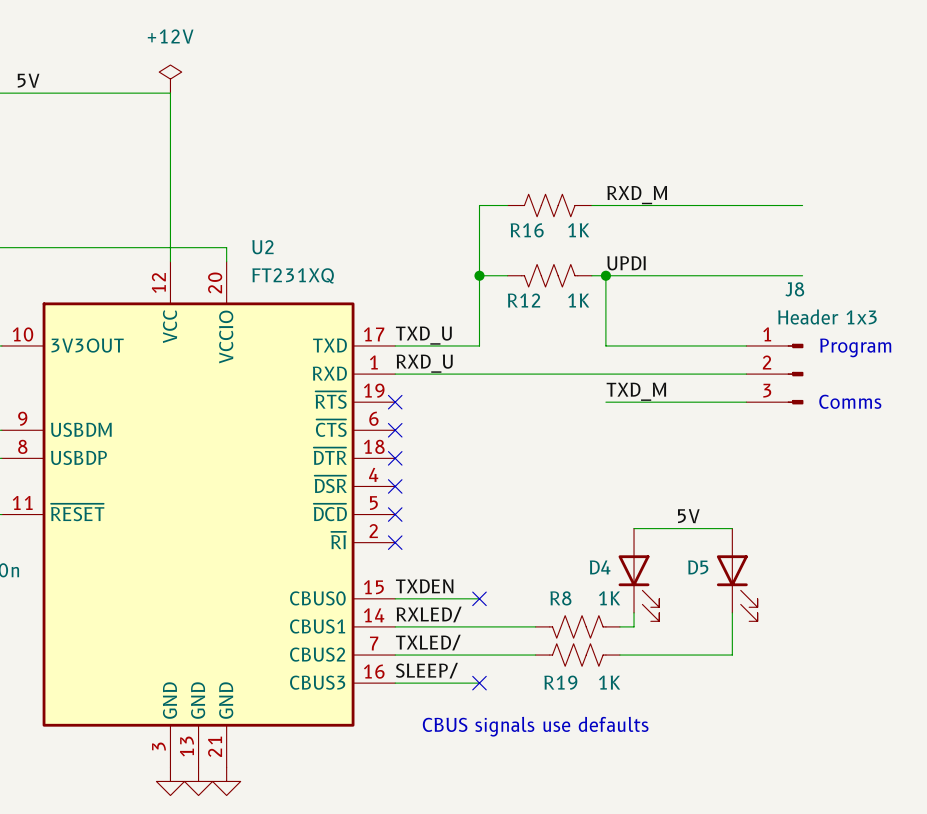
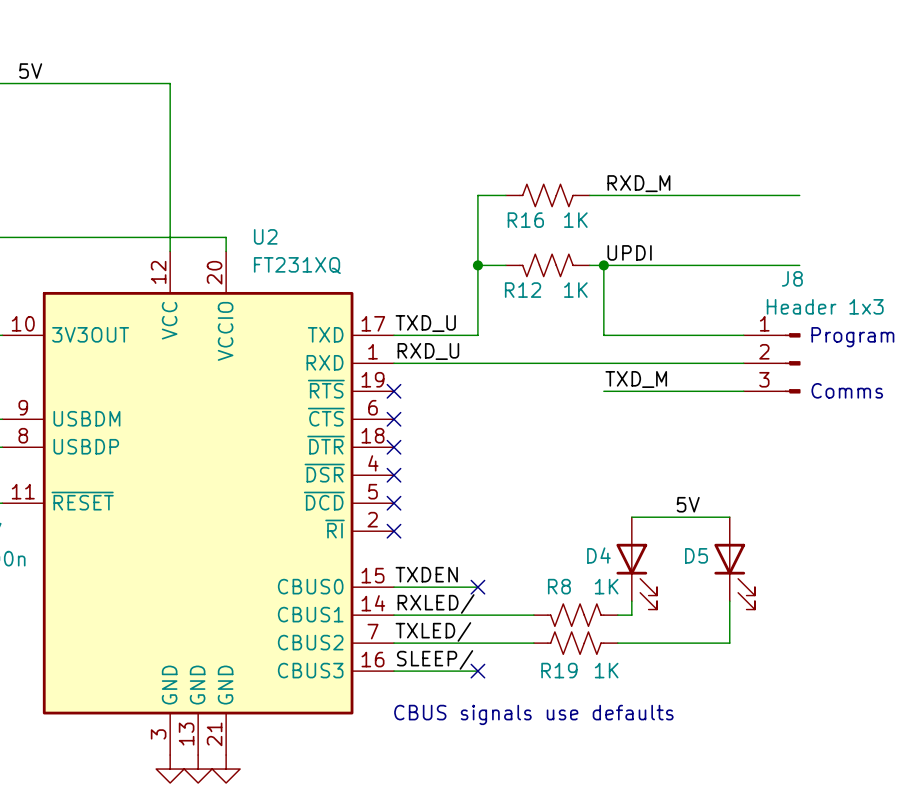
power symbol: +12V (170, 79) -> none

